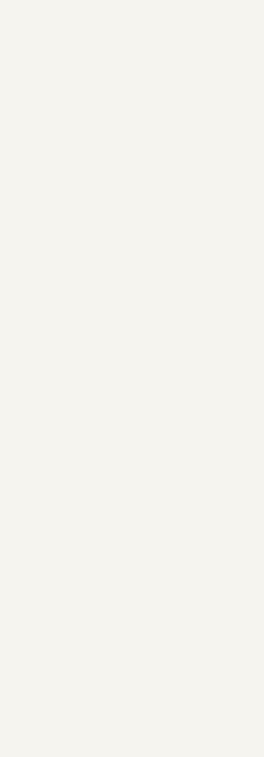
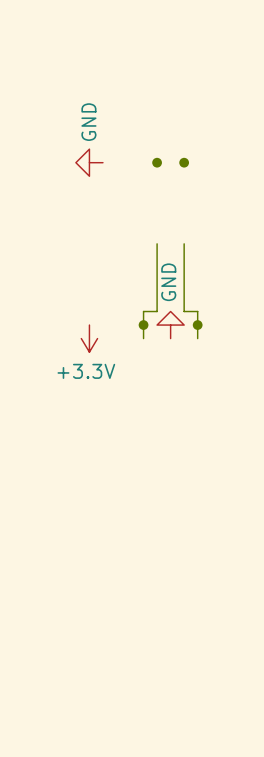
power symbol: none -> GND (89, 162)
junction: none -> (157, 162)
junction: none -> (184, 162)
wire: none -> (157, 243) (157, 311) (143, 311) (143, 338)
wire: none -> (184, 243) (184, 311) (197, 311) (197, 338)
junction: none -> (143, 325)
power symbol: none -> GND (170, 325)
junction: none -> (197, 325)
power symbol: none -> +3.3V (89, 338)

